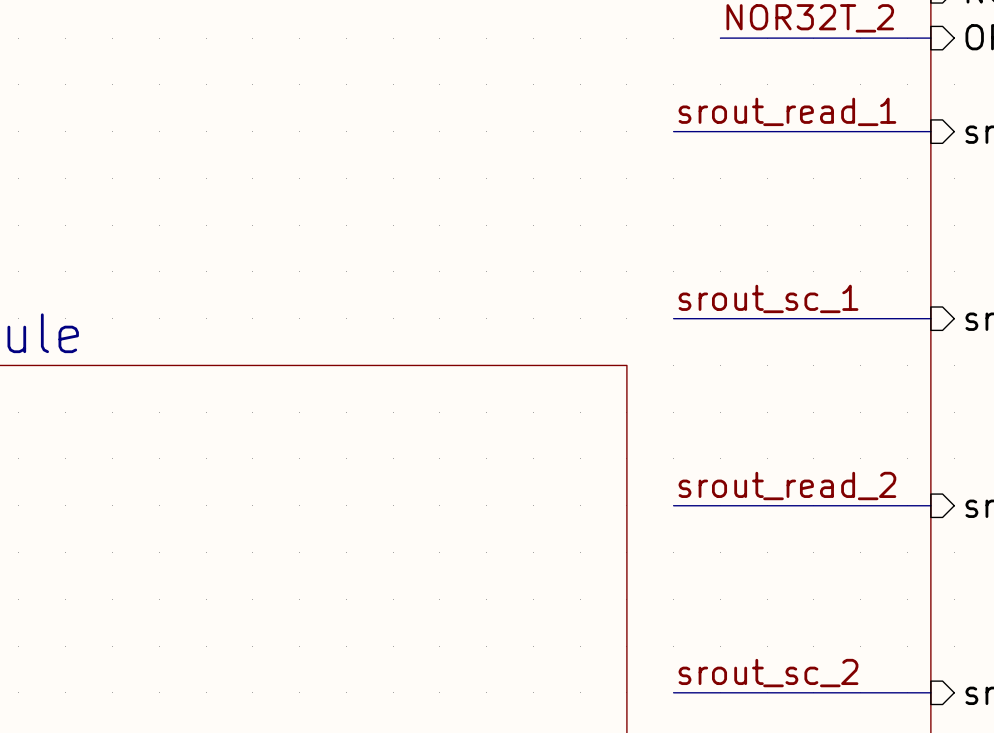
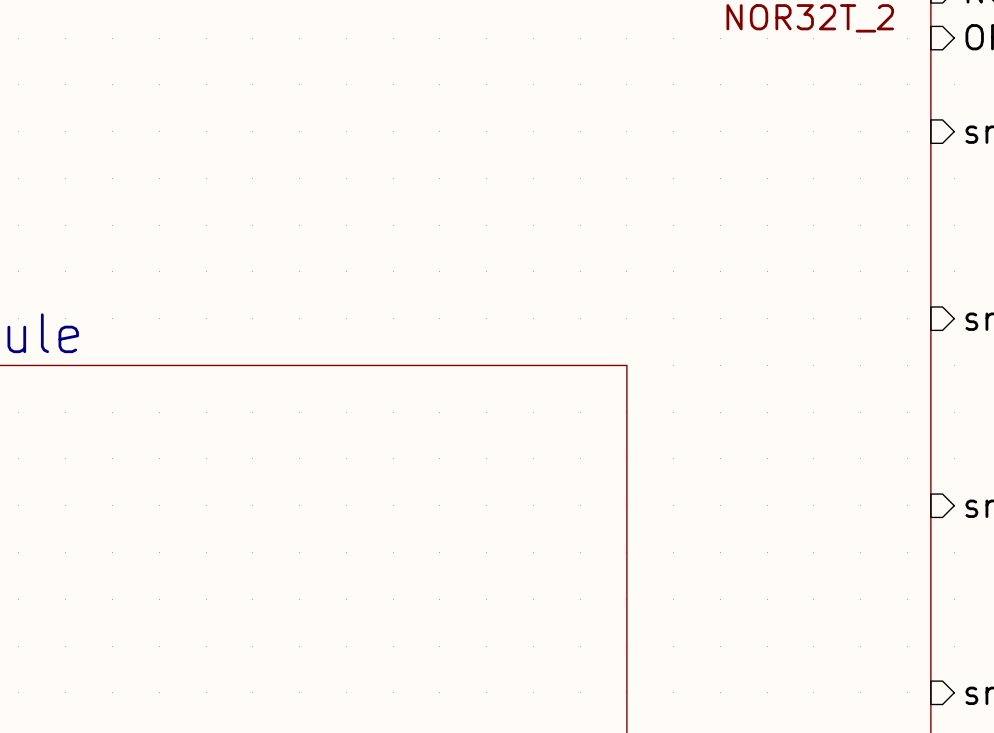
wire: (720, 38) (930, 38) -> none
label: srout_read_1 (787, 111) -> none
wire: (673, 131) (930, 131) -> none
label: srout_sc_1 (768, 298) -> none
wire: (673, 318) (930, 318) -> none
label: srout_read_2 (787, 485) -> none
wire: (673, 505) (930, 505) -> none
label: srout_sc_2 (768, 673) -> none
wire: (673, 692) (930, 692) -> none

